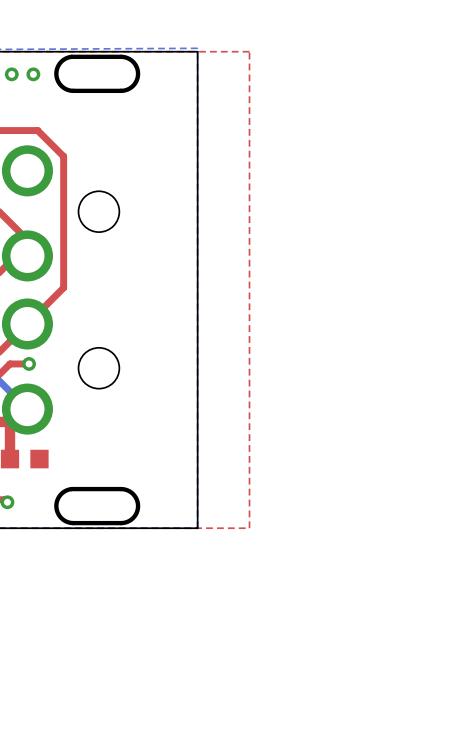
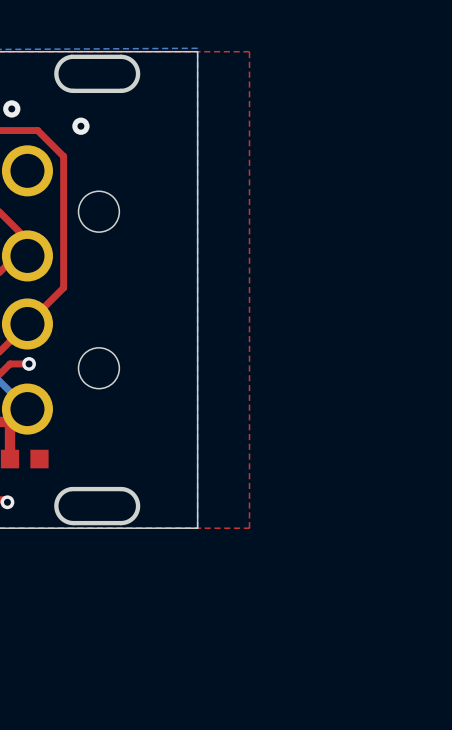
via: (11, 74) -> none
via: (33, 74) -> none
via: none -> (11, 108)
via: none -> (80, 126)

